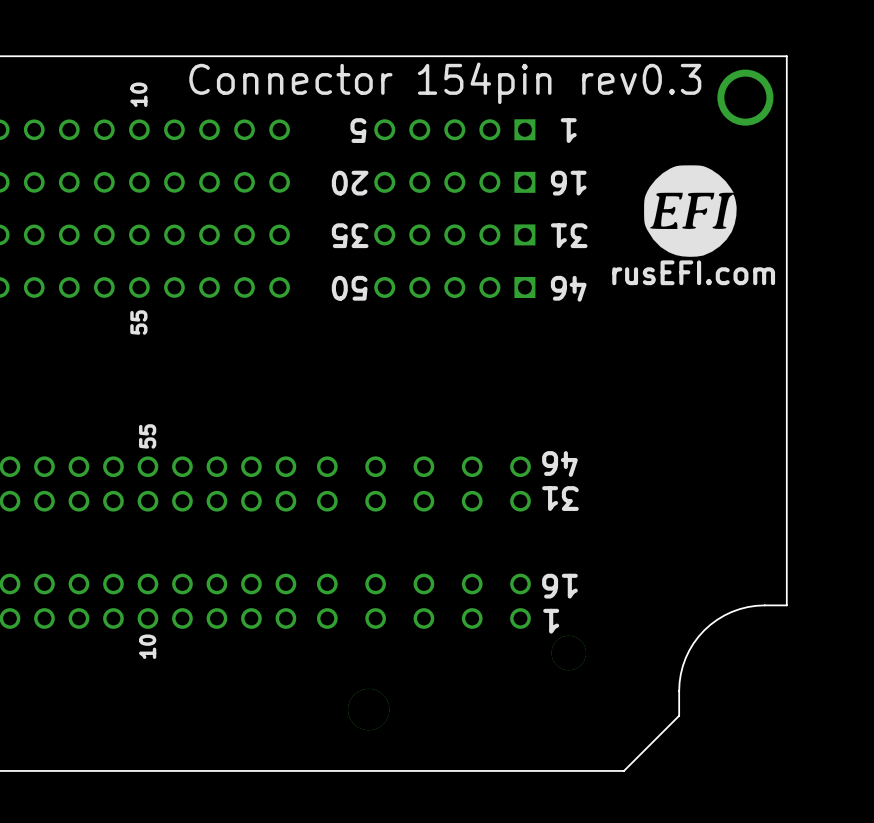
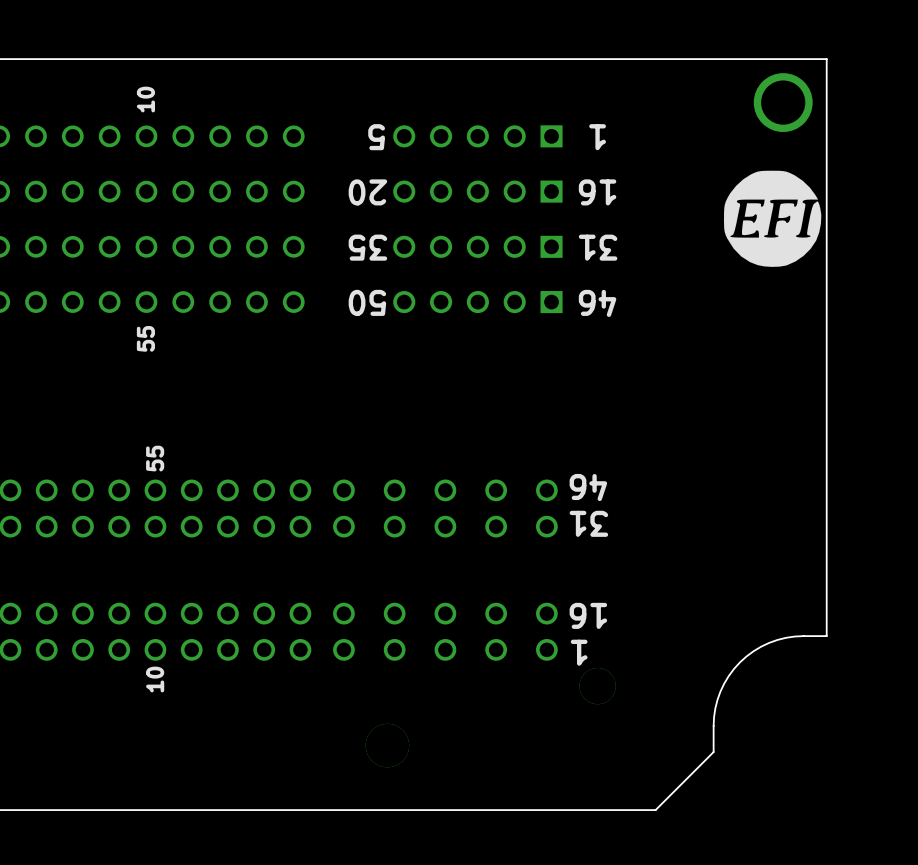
text: Connector 154pin rev0.3 (445, 83) -> none
drawing position: (690, 211) -> (772, 218)
text: rusEFI.com (693, 272) -> none

